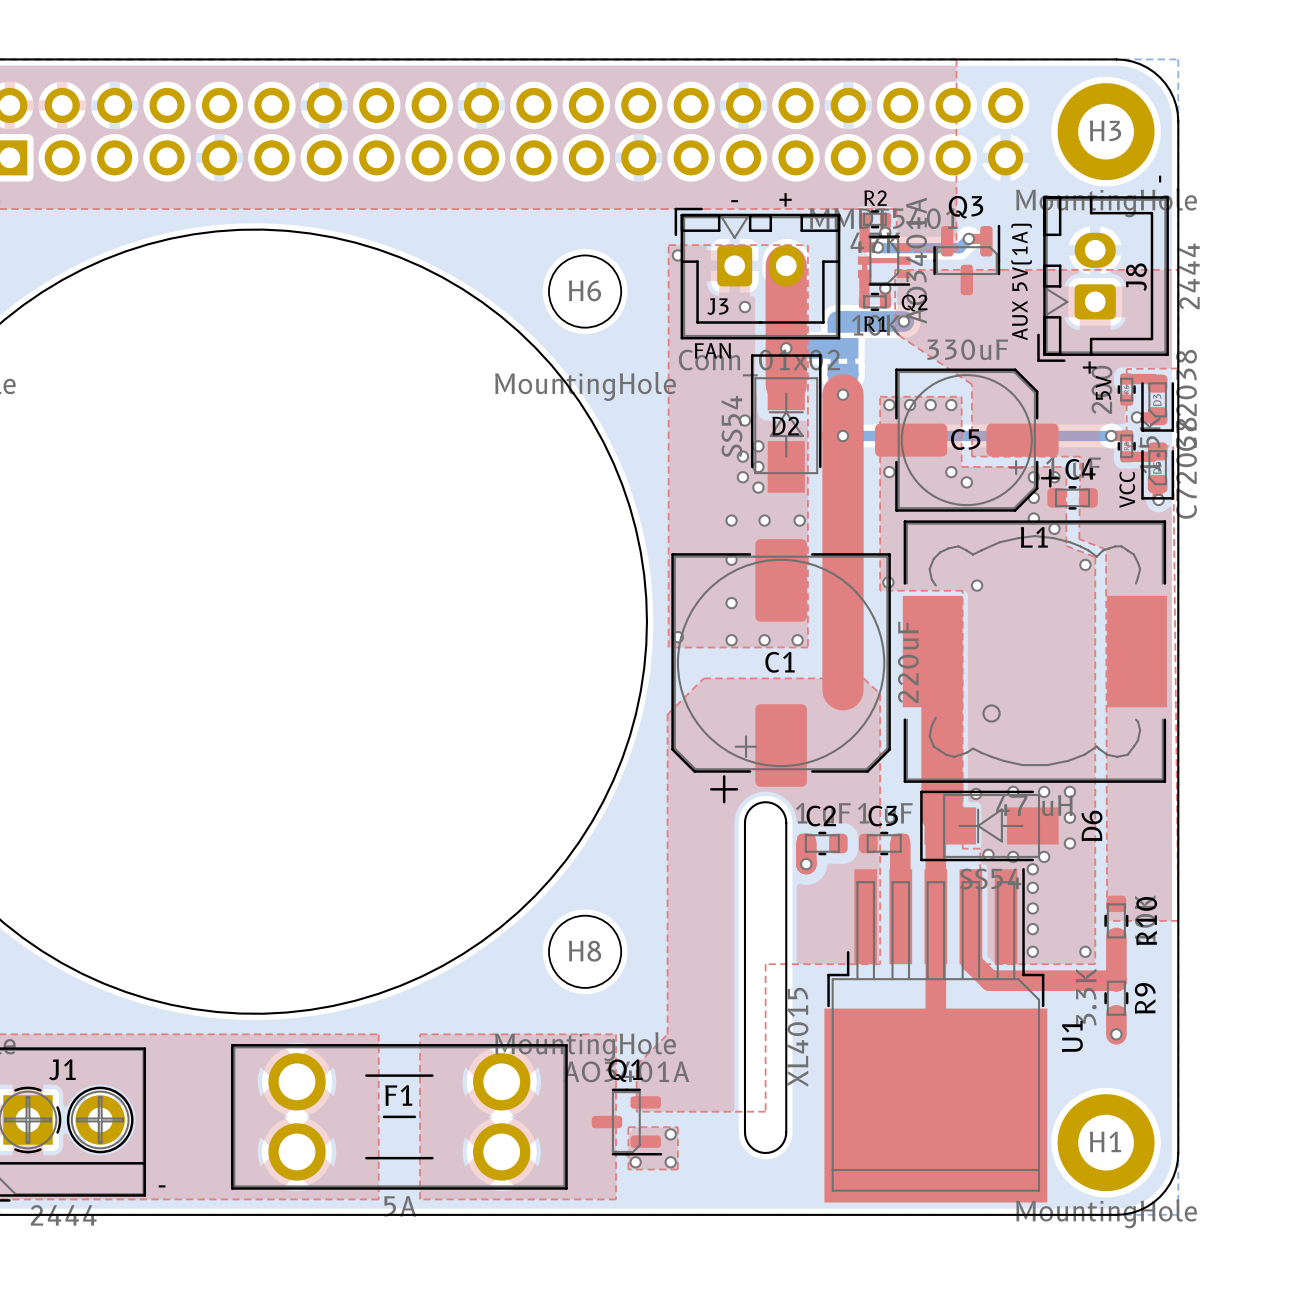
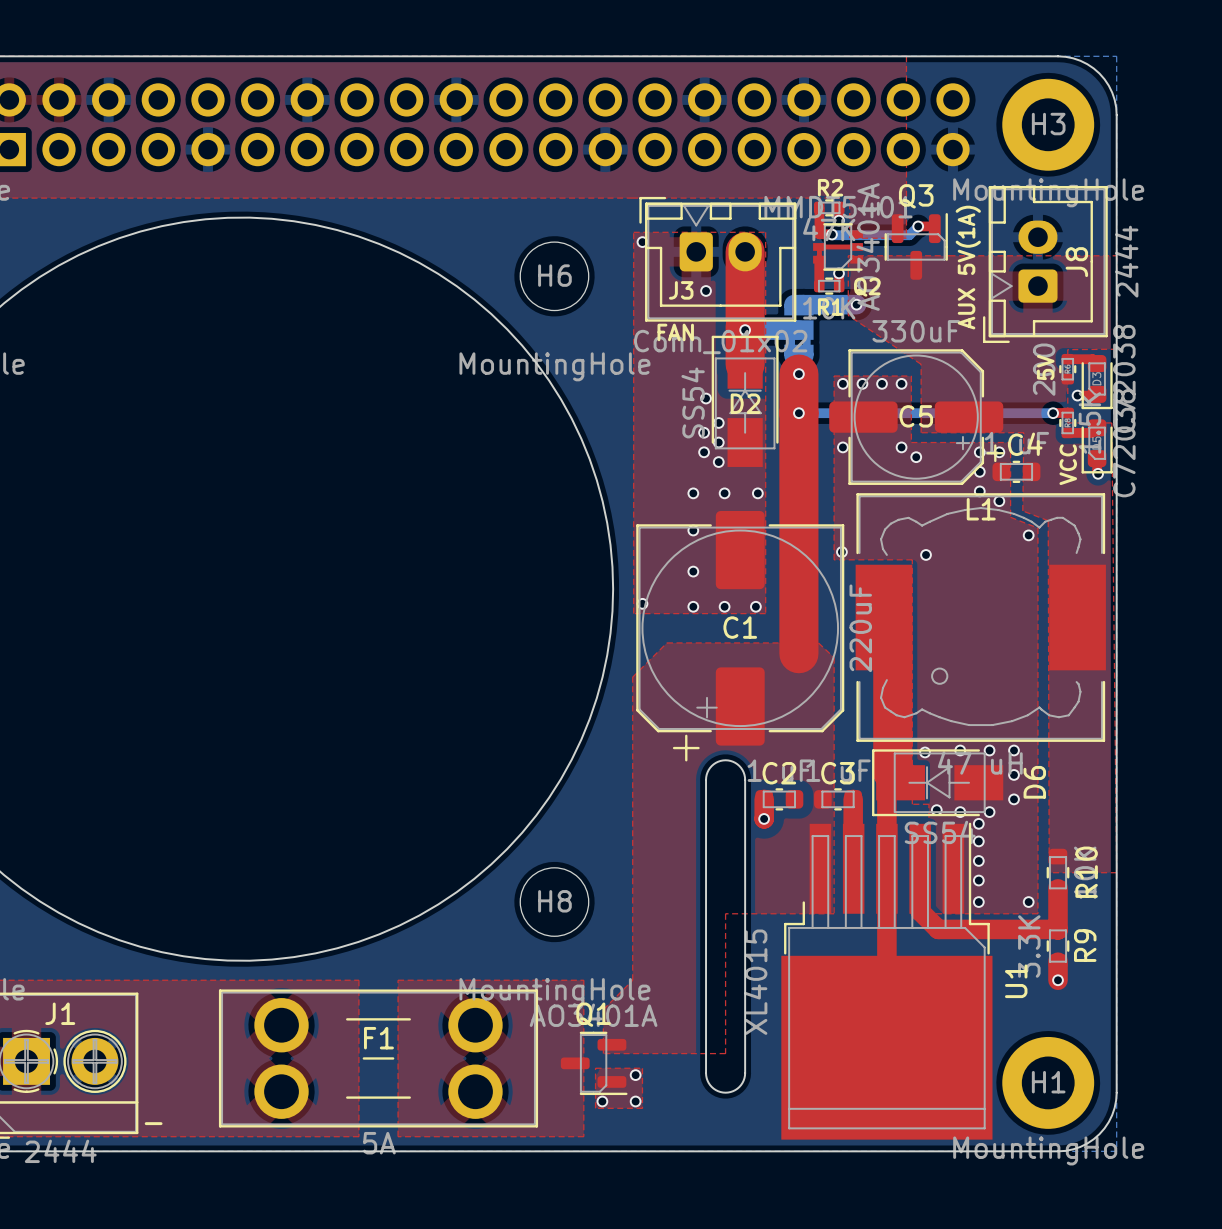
text: - (1160, 179) -> none
text: + (785, 199) -> none
text: - (734, 201) -> none
text: + (1089, 367) -> none

